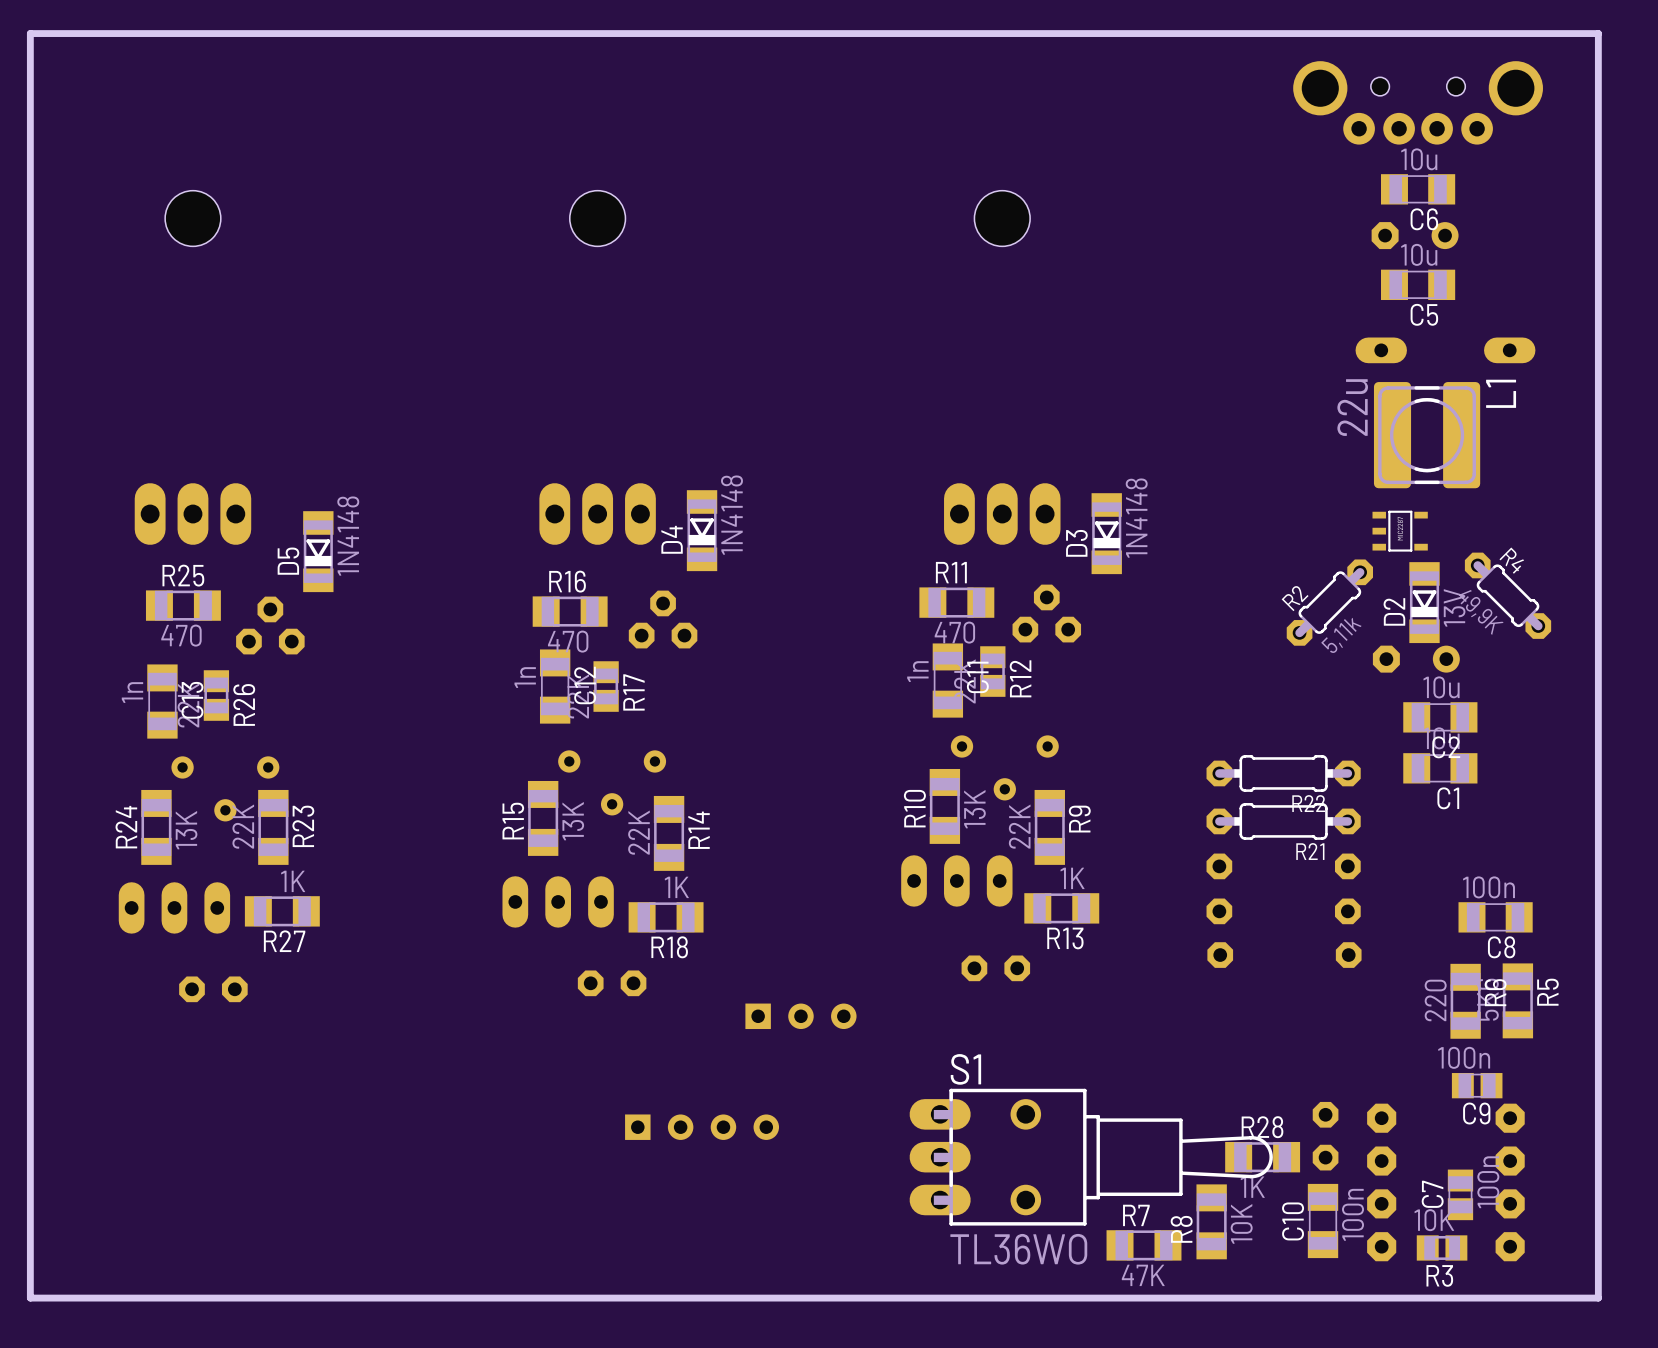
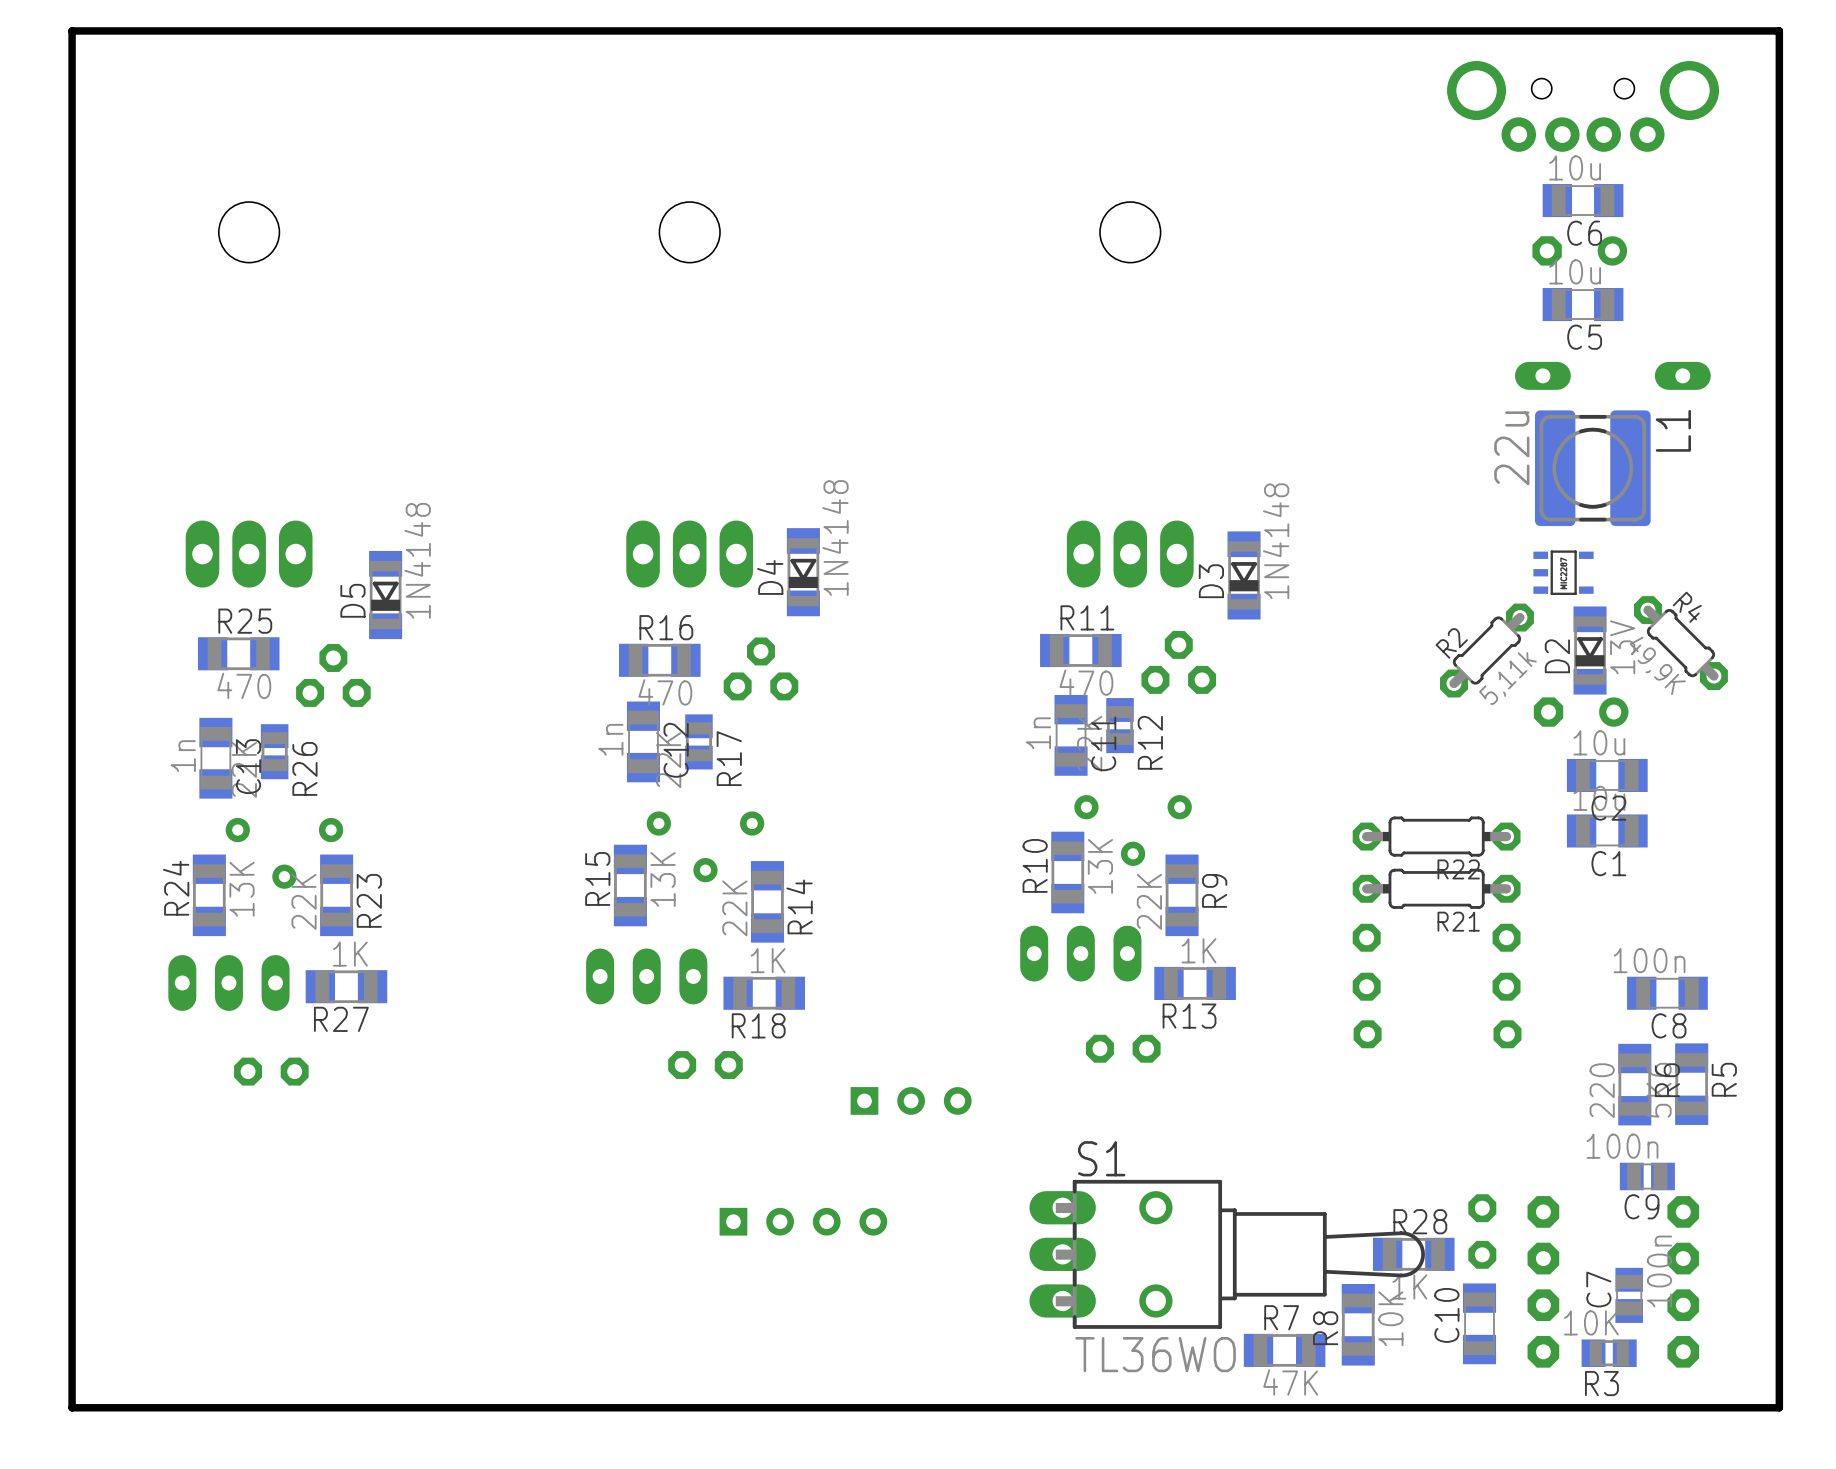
C10 value: 100n (1353, 1214) -> none

